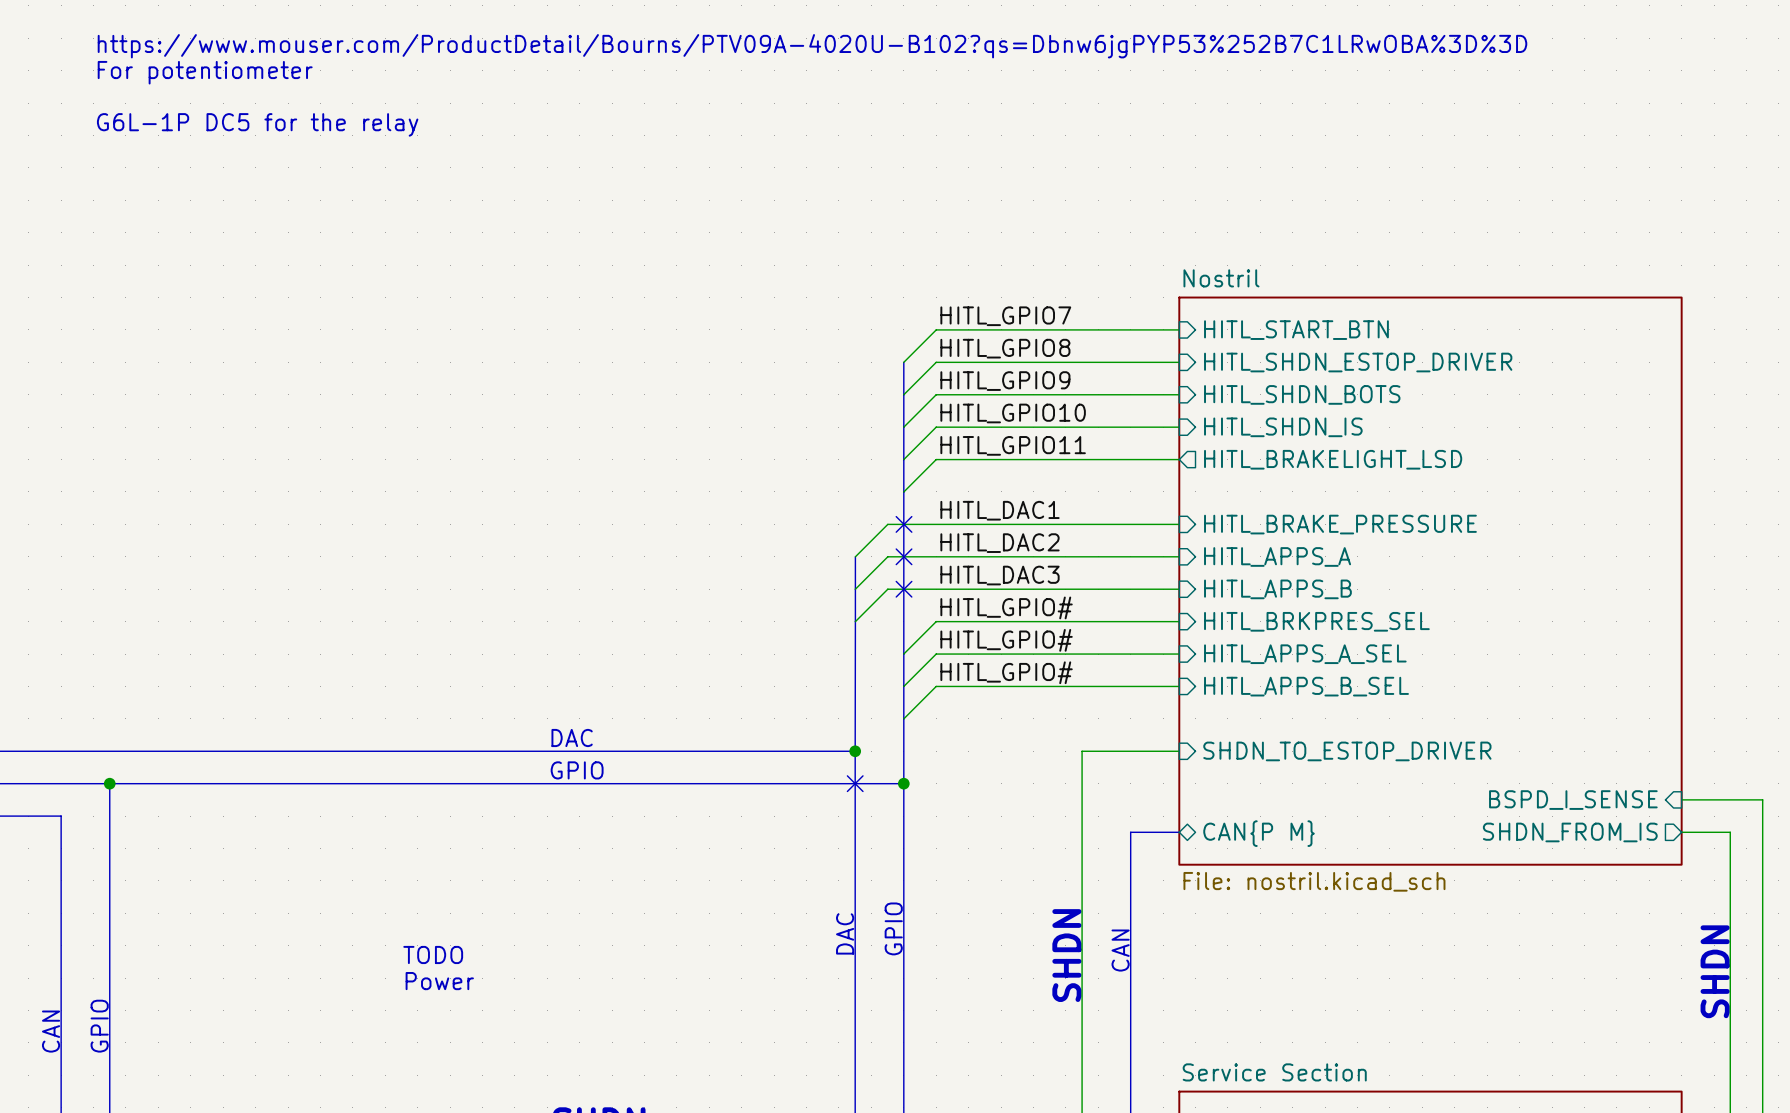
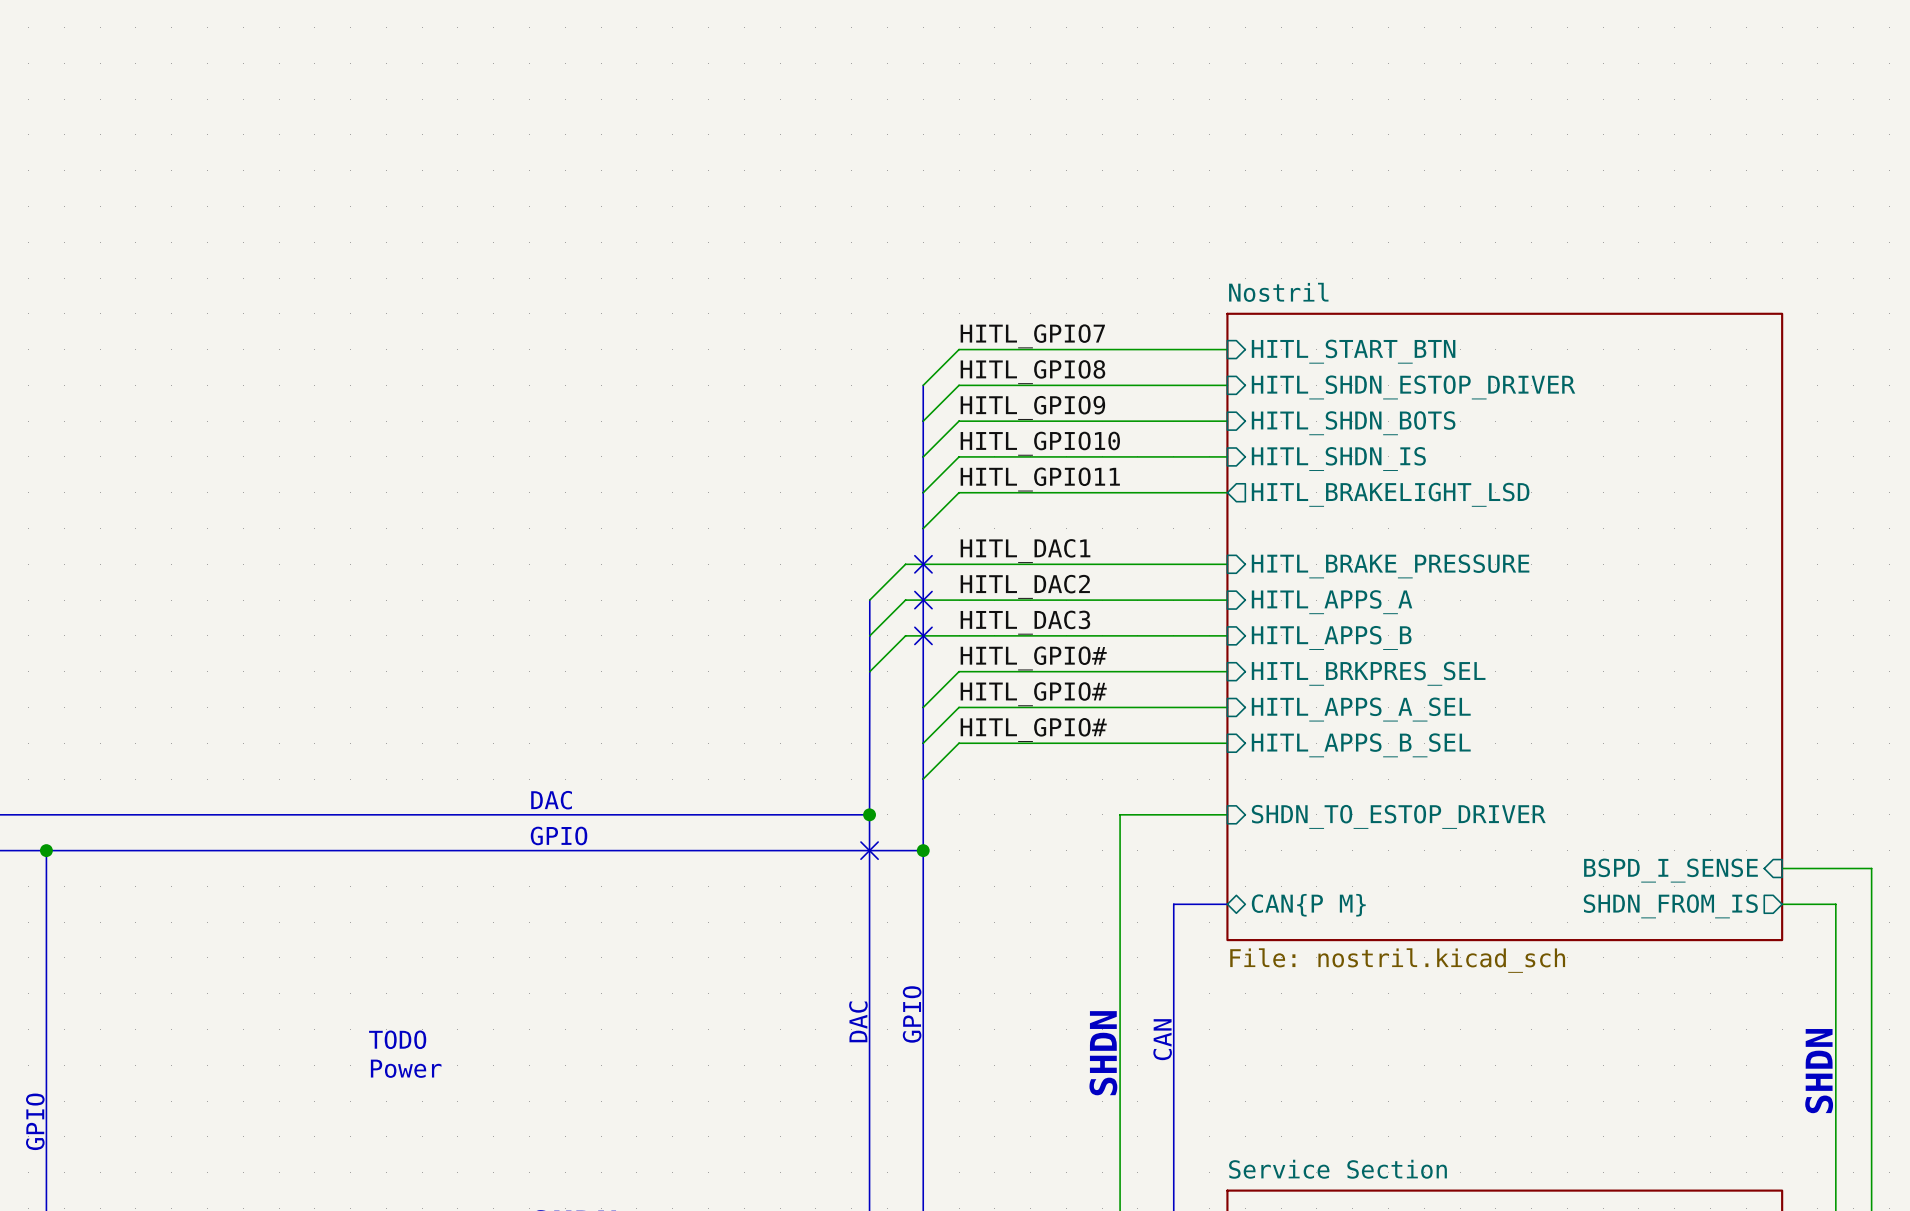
text: https://www.mouser.com/ProductDetail/Bourns/PTV09A-4020U-B102?qs=Dbnw6jgPYP53%252B7C1LRwOBA%3D%3D (812, 46) -> none
text: For potentiometer (205, 72) -> none
text: G6L-1P DC5 for the relay (257, 124) -> none

